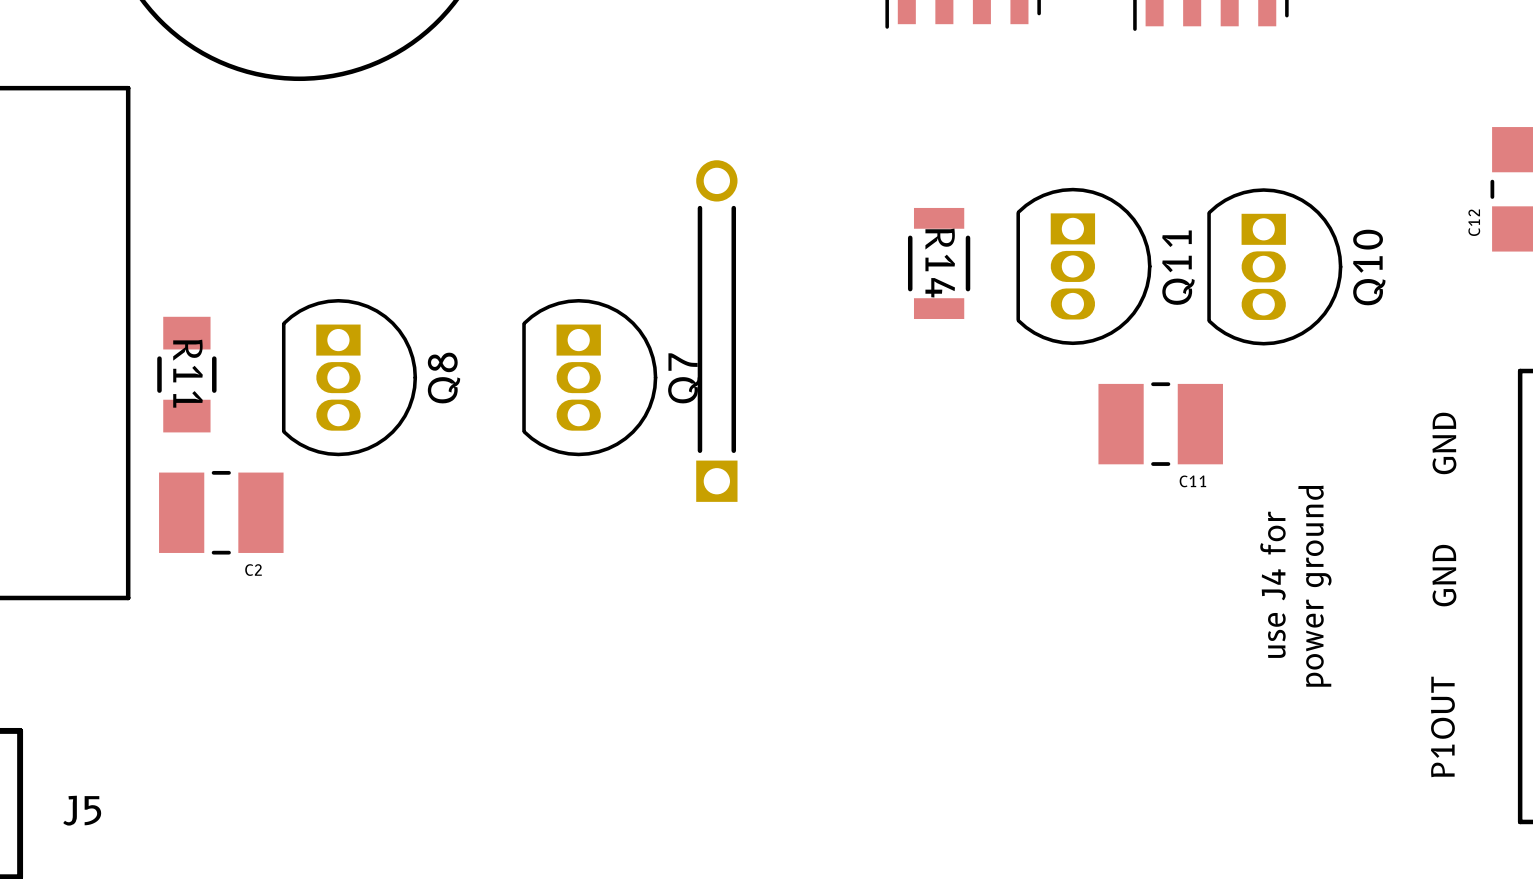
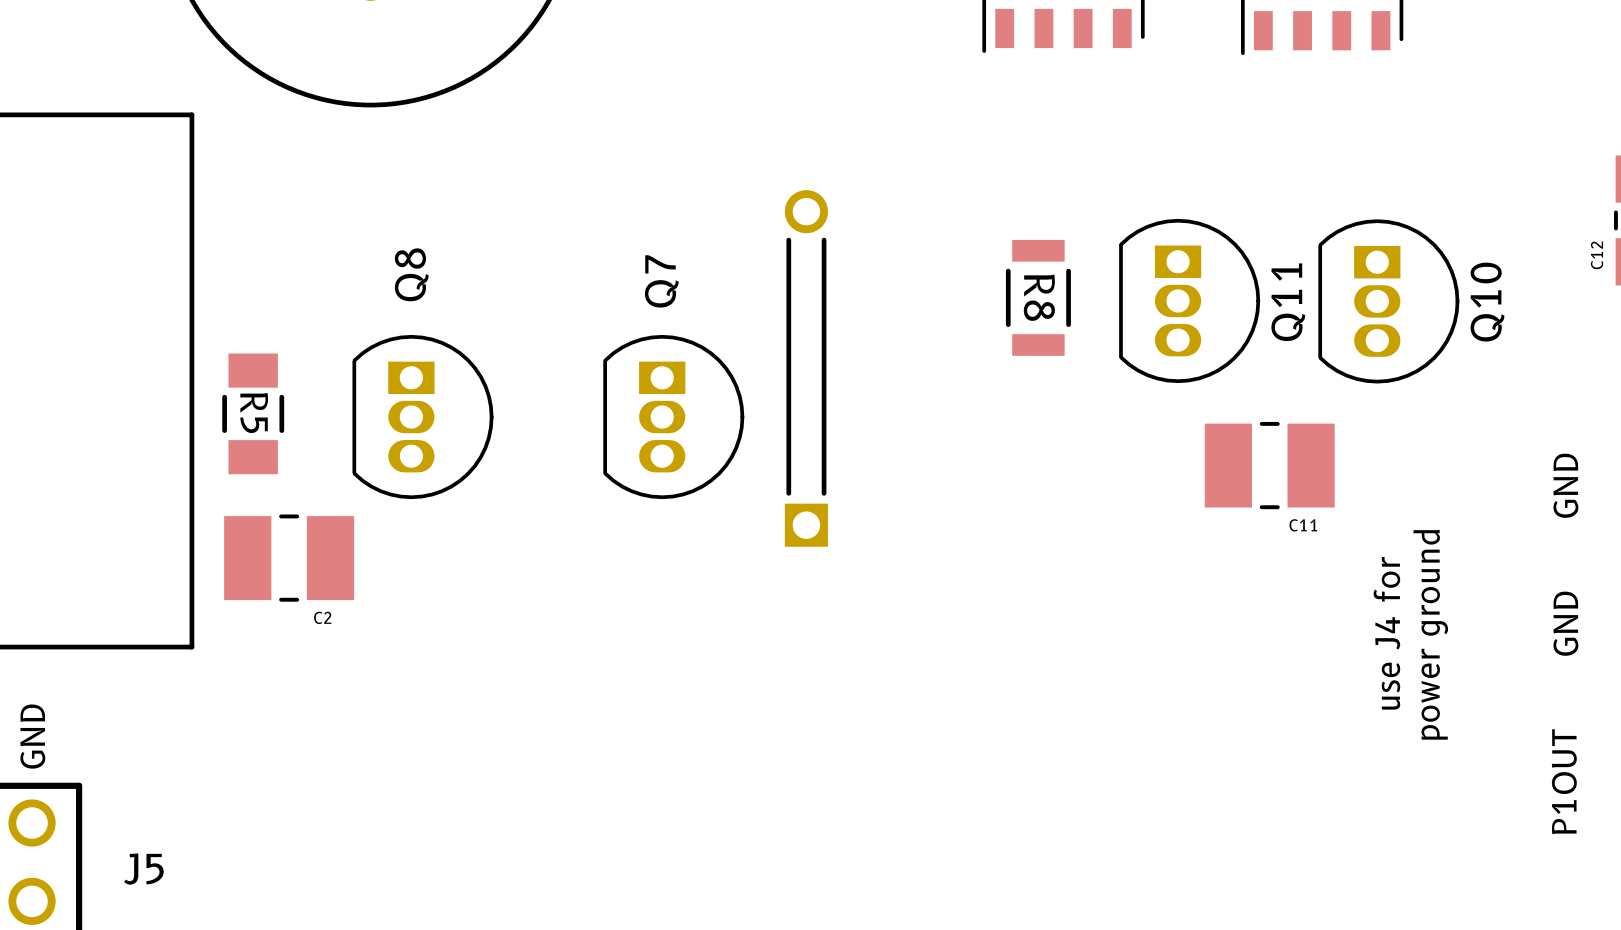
R14 name: R14 (940, 263) -> R8 (1039, 297)
R11 name: R11 (187, 373) -> R5 (254, 413)
Q8 name position: Q8 (444, 378) -> Q8 (411, 274)
Q7 name position: Q7 (684, 378) -> Q7 (661, 281)

